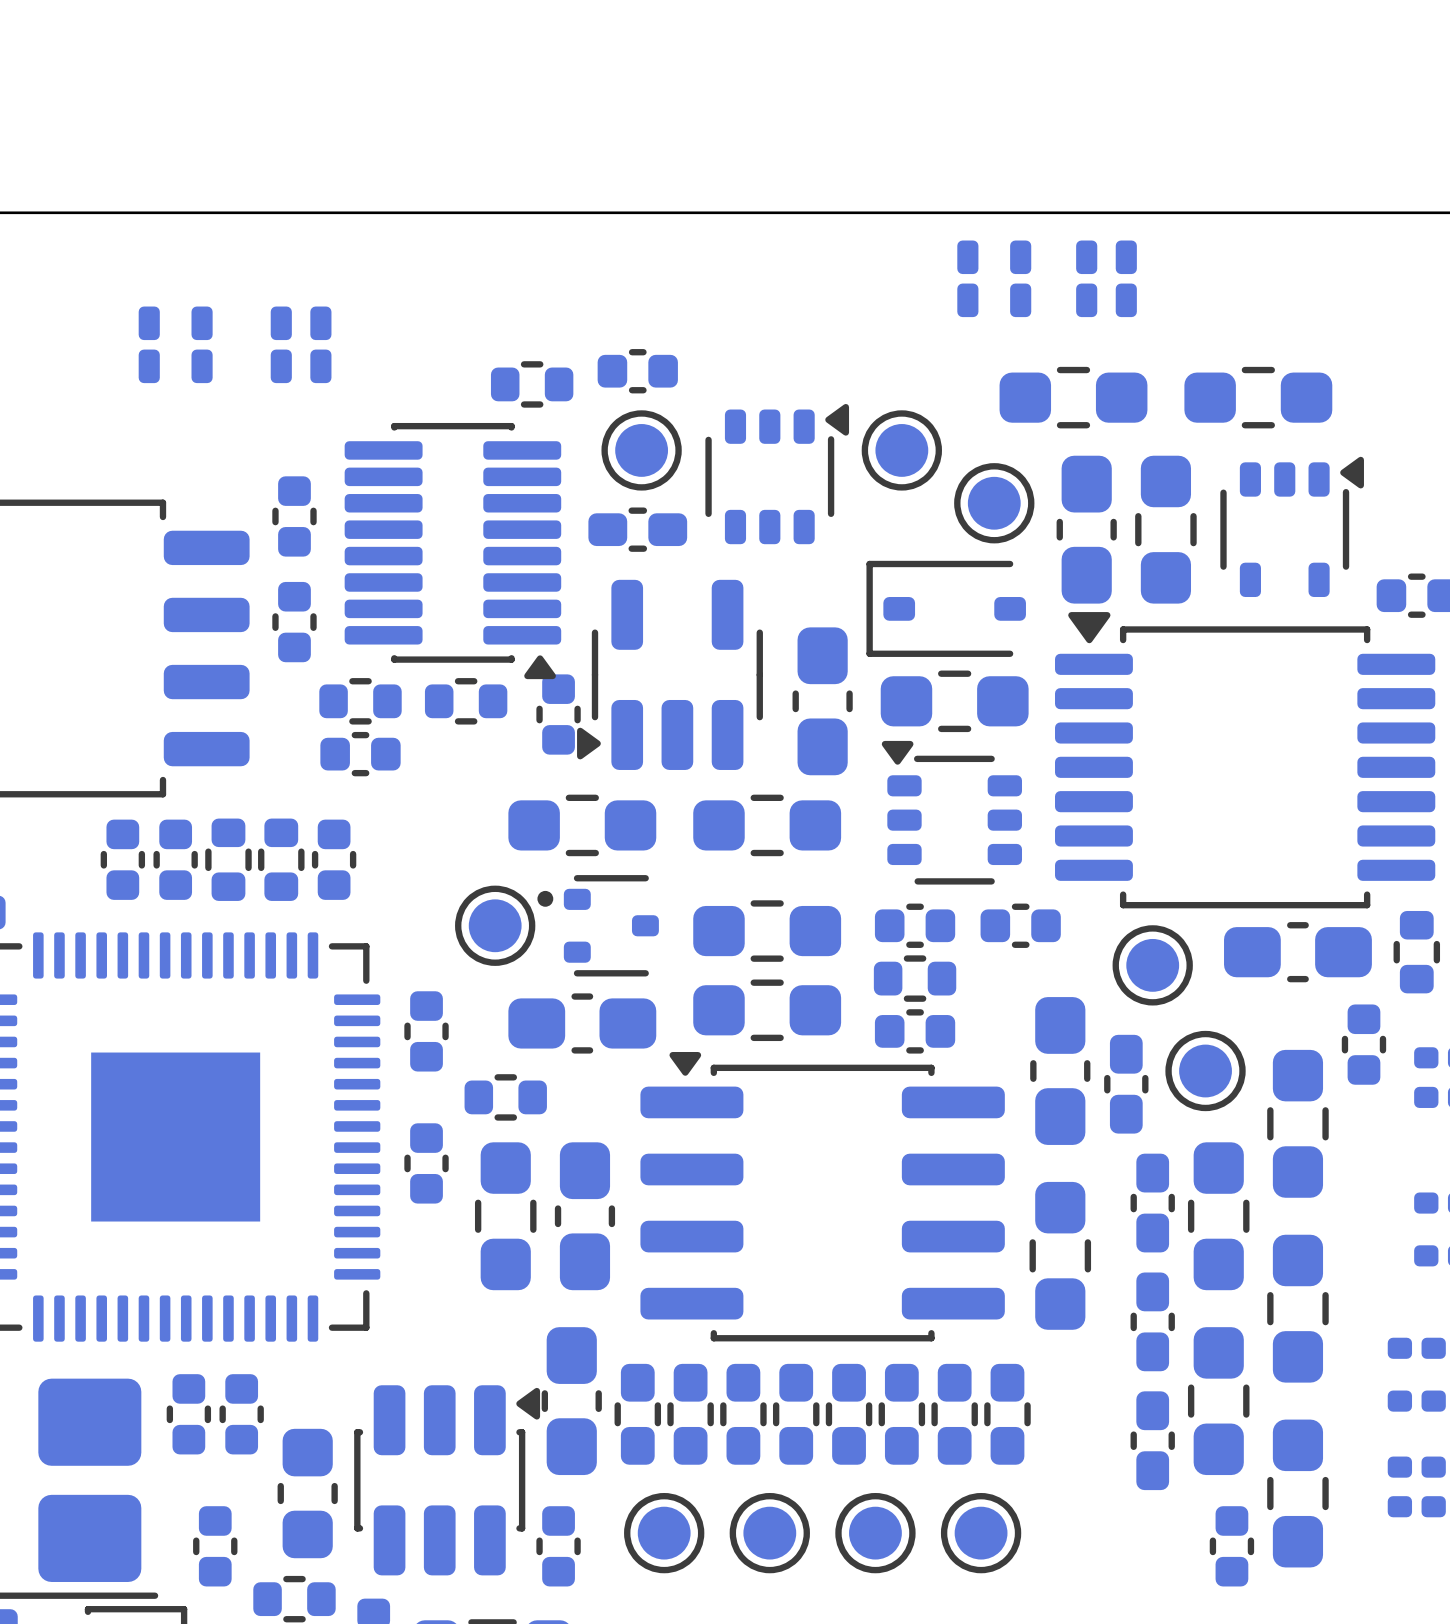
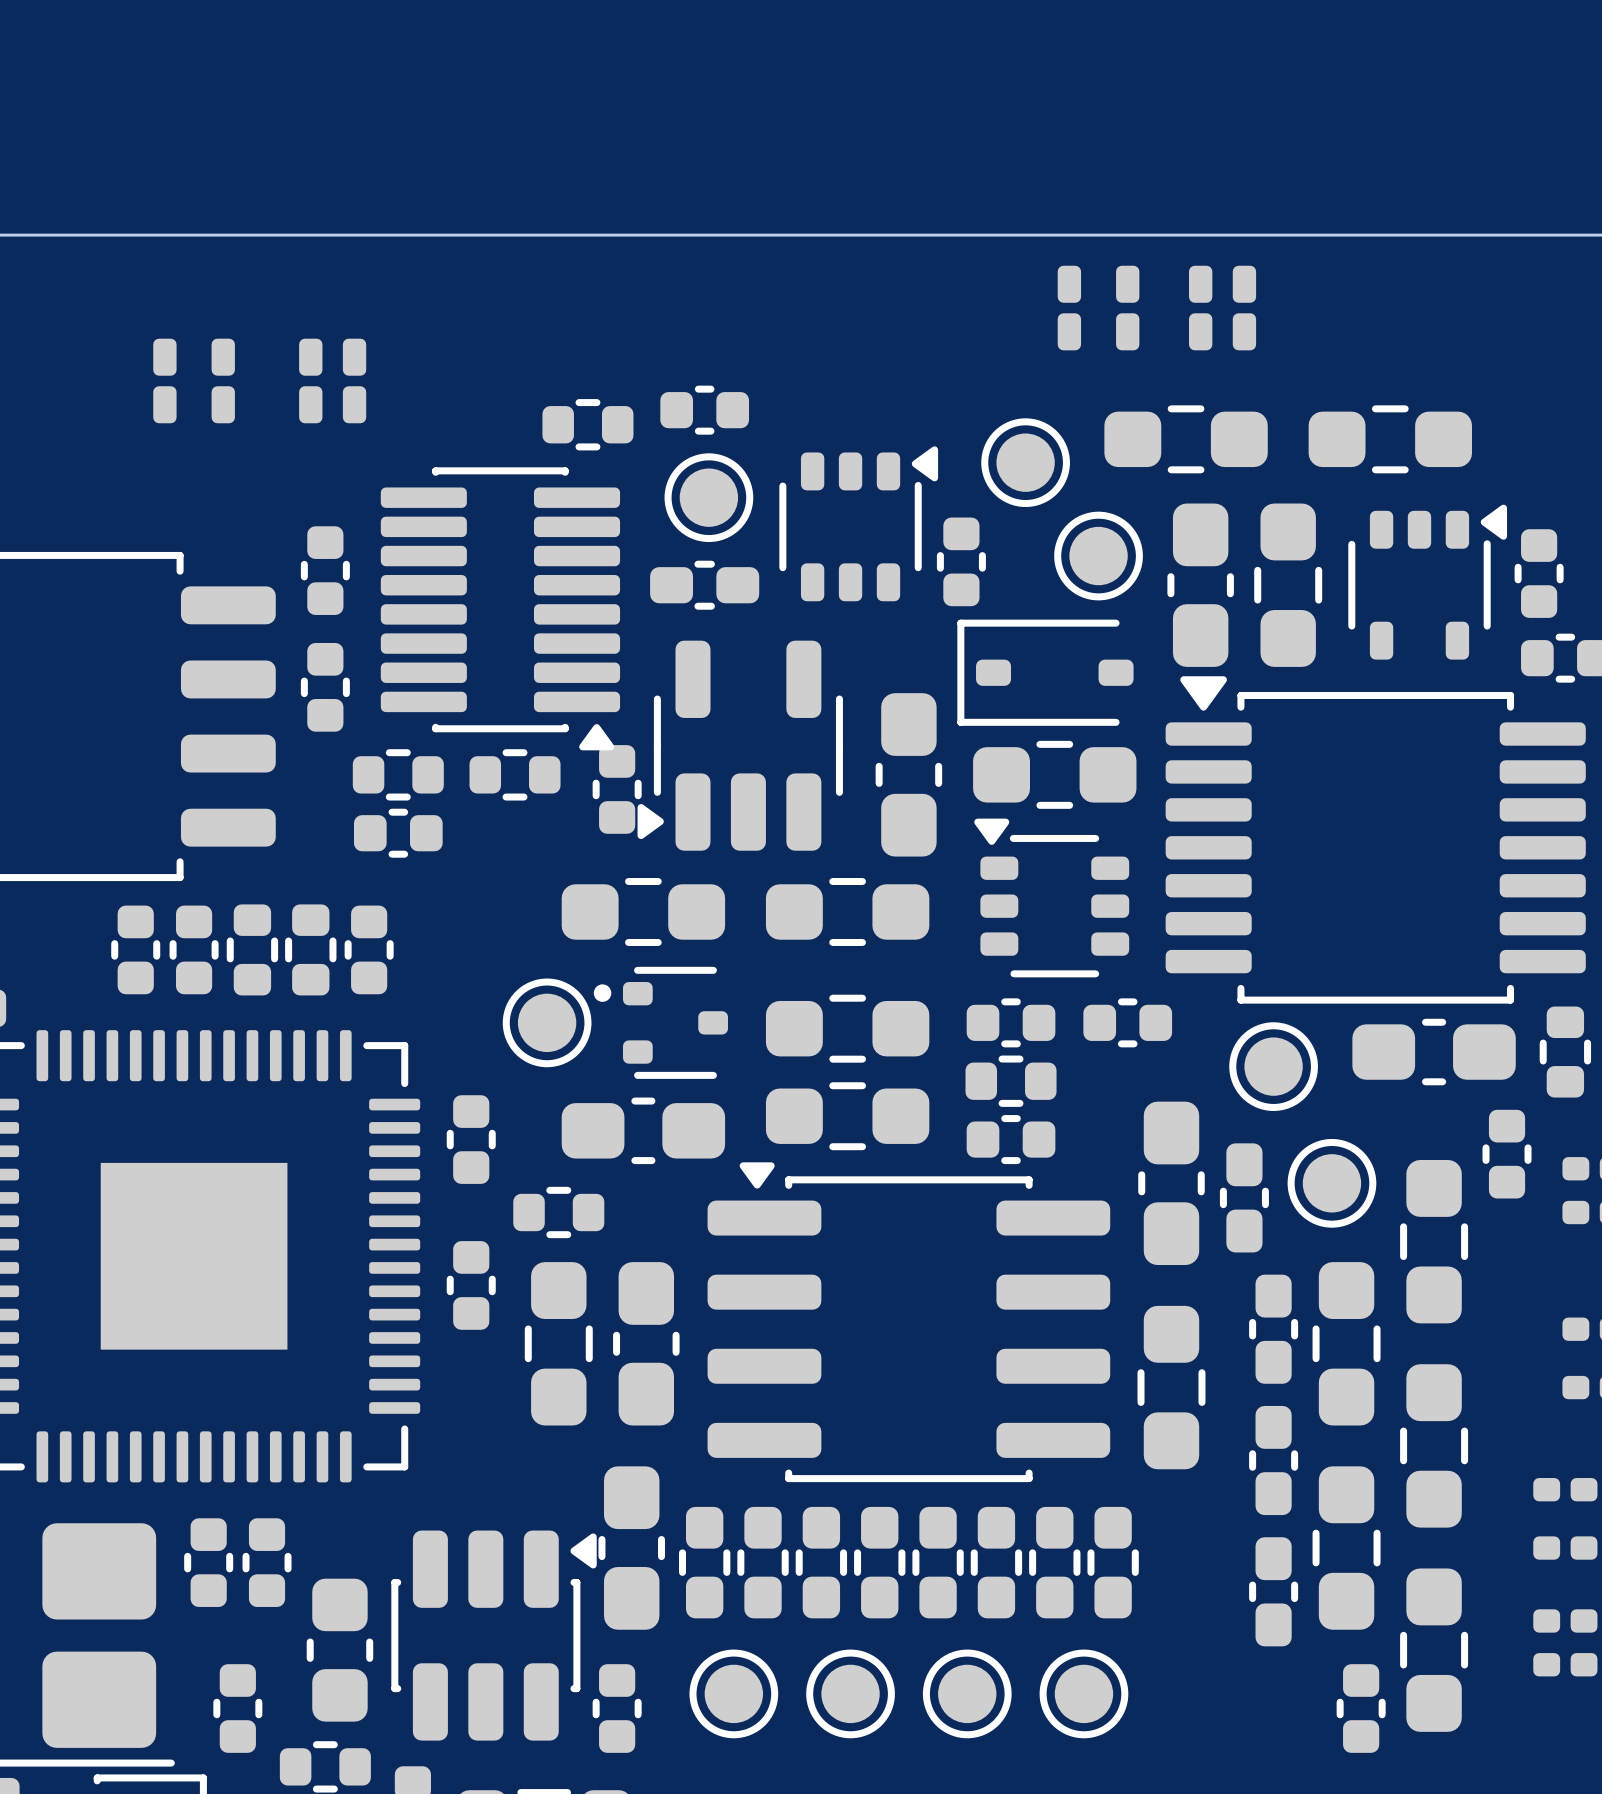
part position: (901, 450) -> (1025, 462)
part: none -> (961, 561)
part: none -> (1539, 573)

